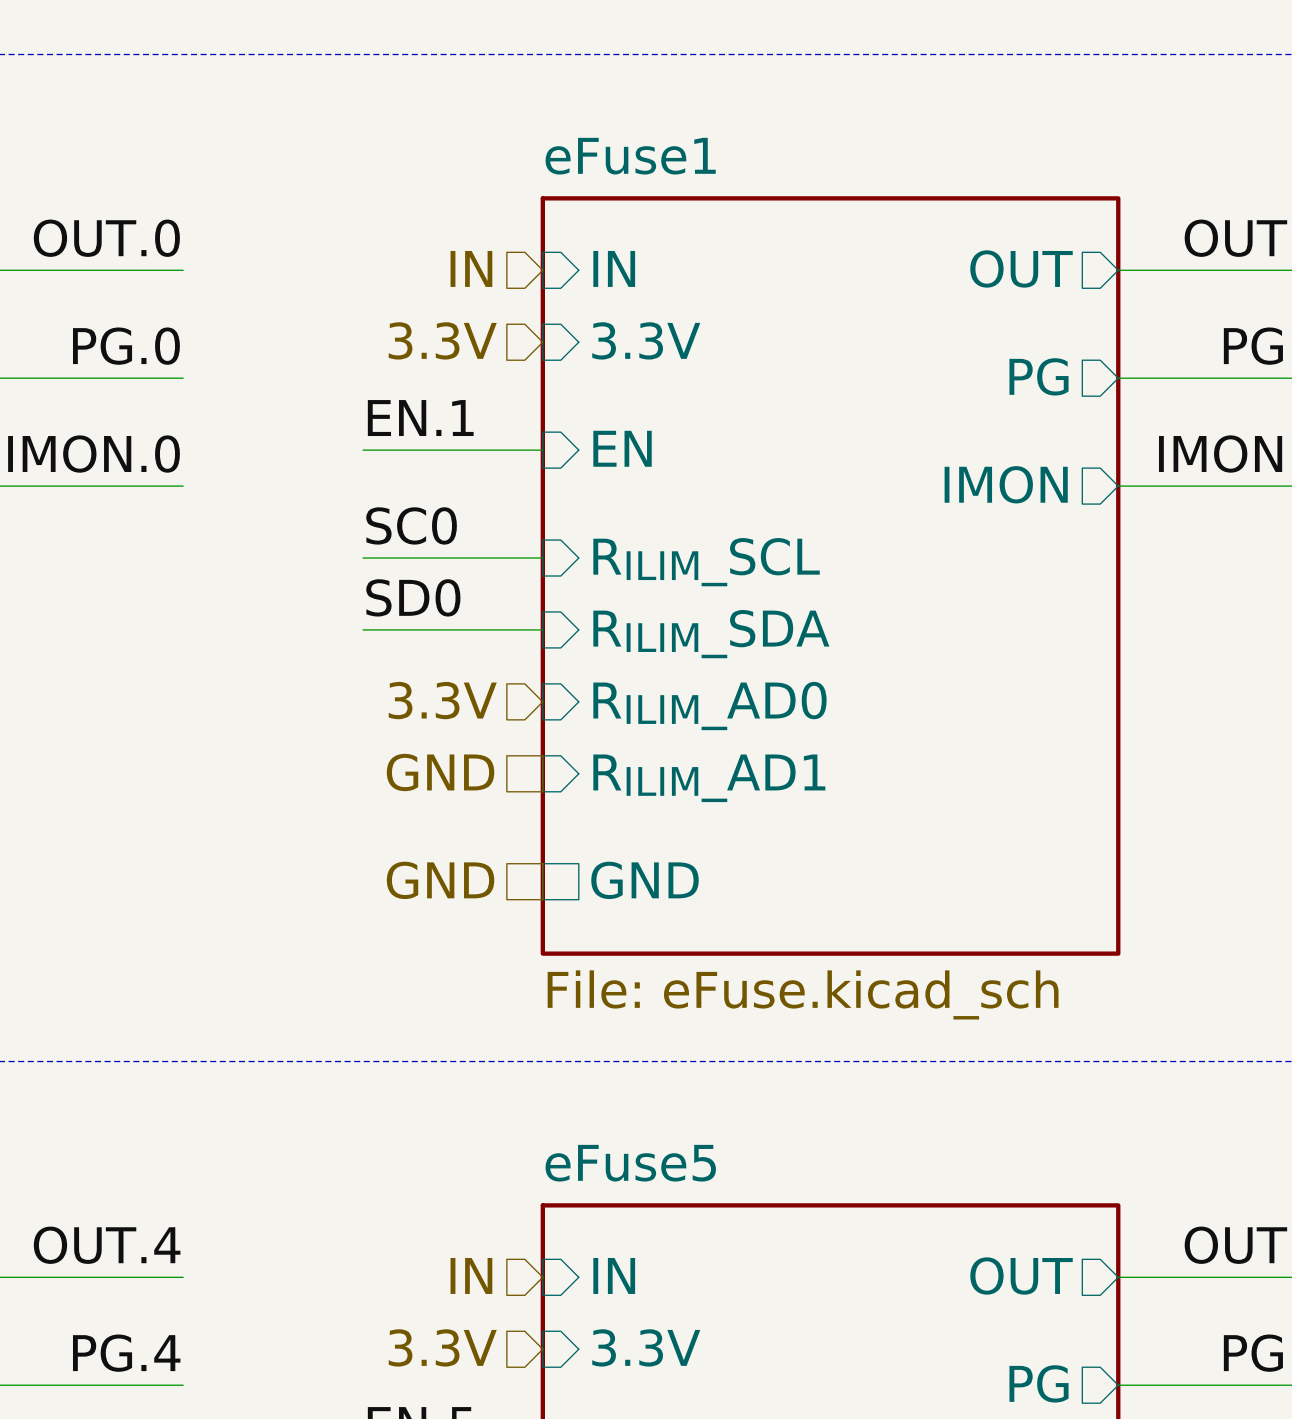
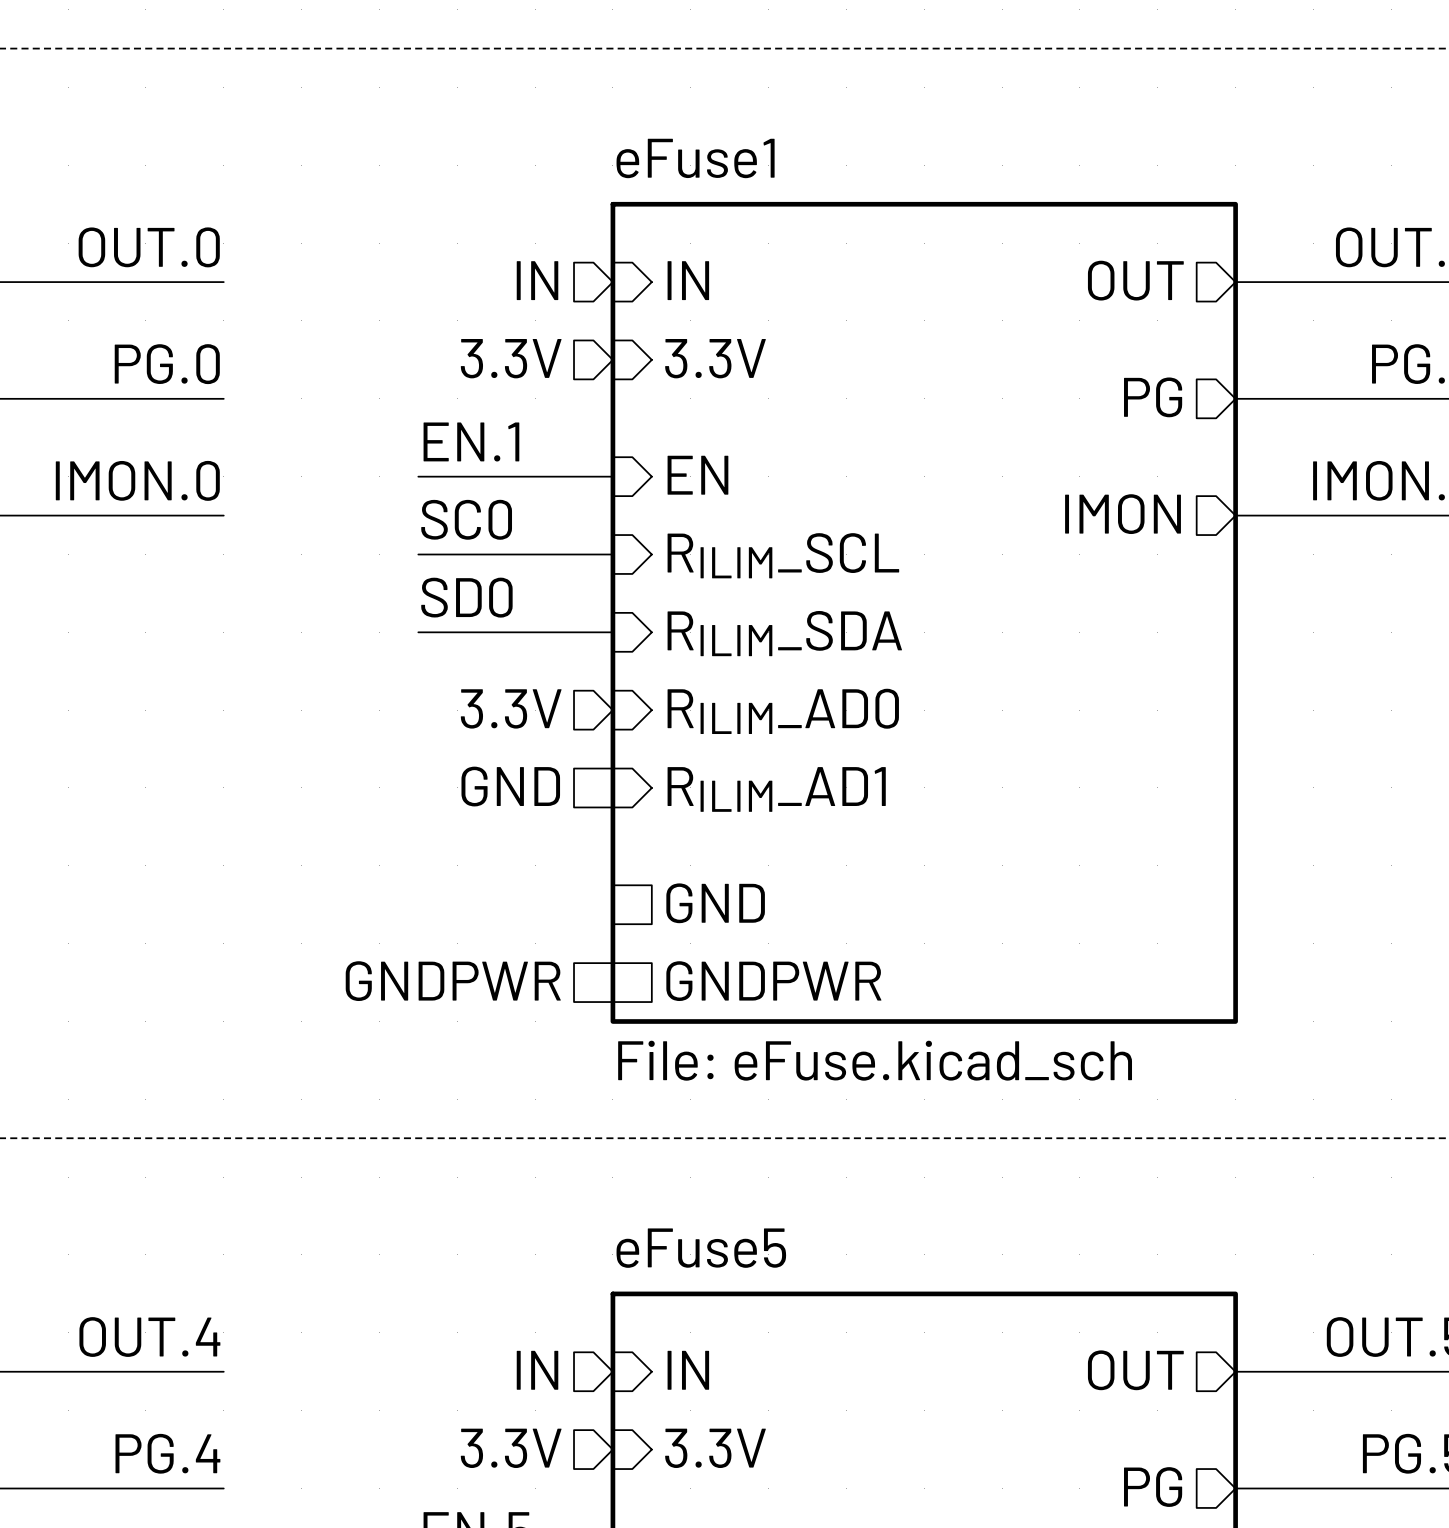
label position: SC0 (411, 525) -> SC0 (466, 519)
wire: (363, 558) (542, 558) -> (418, 554) (612, 554)
sheet pin position: RILIM_SCL (706, 562) -> RILIM_SCL (783, 555)
label position: SD0 (413, 597) -> SD0 (466, 597)
wire: (363, 629) (542, 629) -> (418, 632) (612, 632)
sheet pin position: RILIM_SDA (711, 634) -> RILIM_SDA (784, 633)
hierarchical label position: 3.3V (442, 700) -> 3.3V (511, 708)
sheet pin position: RILIM_AD0 (709, 706) -> RILIM_AD0 (783, 711)
hierarchical label position: GND (440, 772) -> GND (510, 786)
sheet pin position: RILIM_AD1 (709, 778) -> RILIM_AD1 (776, 789)
hierarchical label: GND (440, 880) -> GNDPWR (453, 981)
sheet pin position: GND (644, 880) -> GND (715, 903)
sheet pin: none -> GNDPWR (773, 981)

